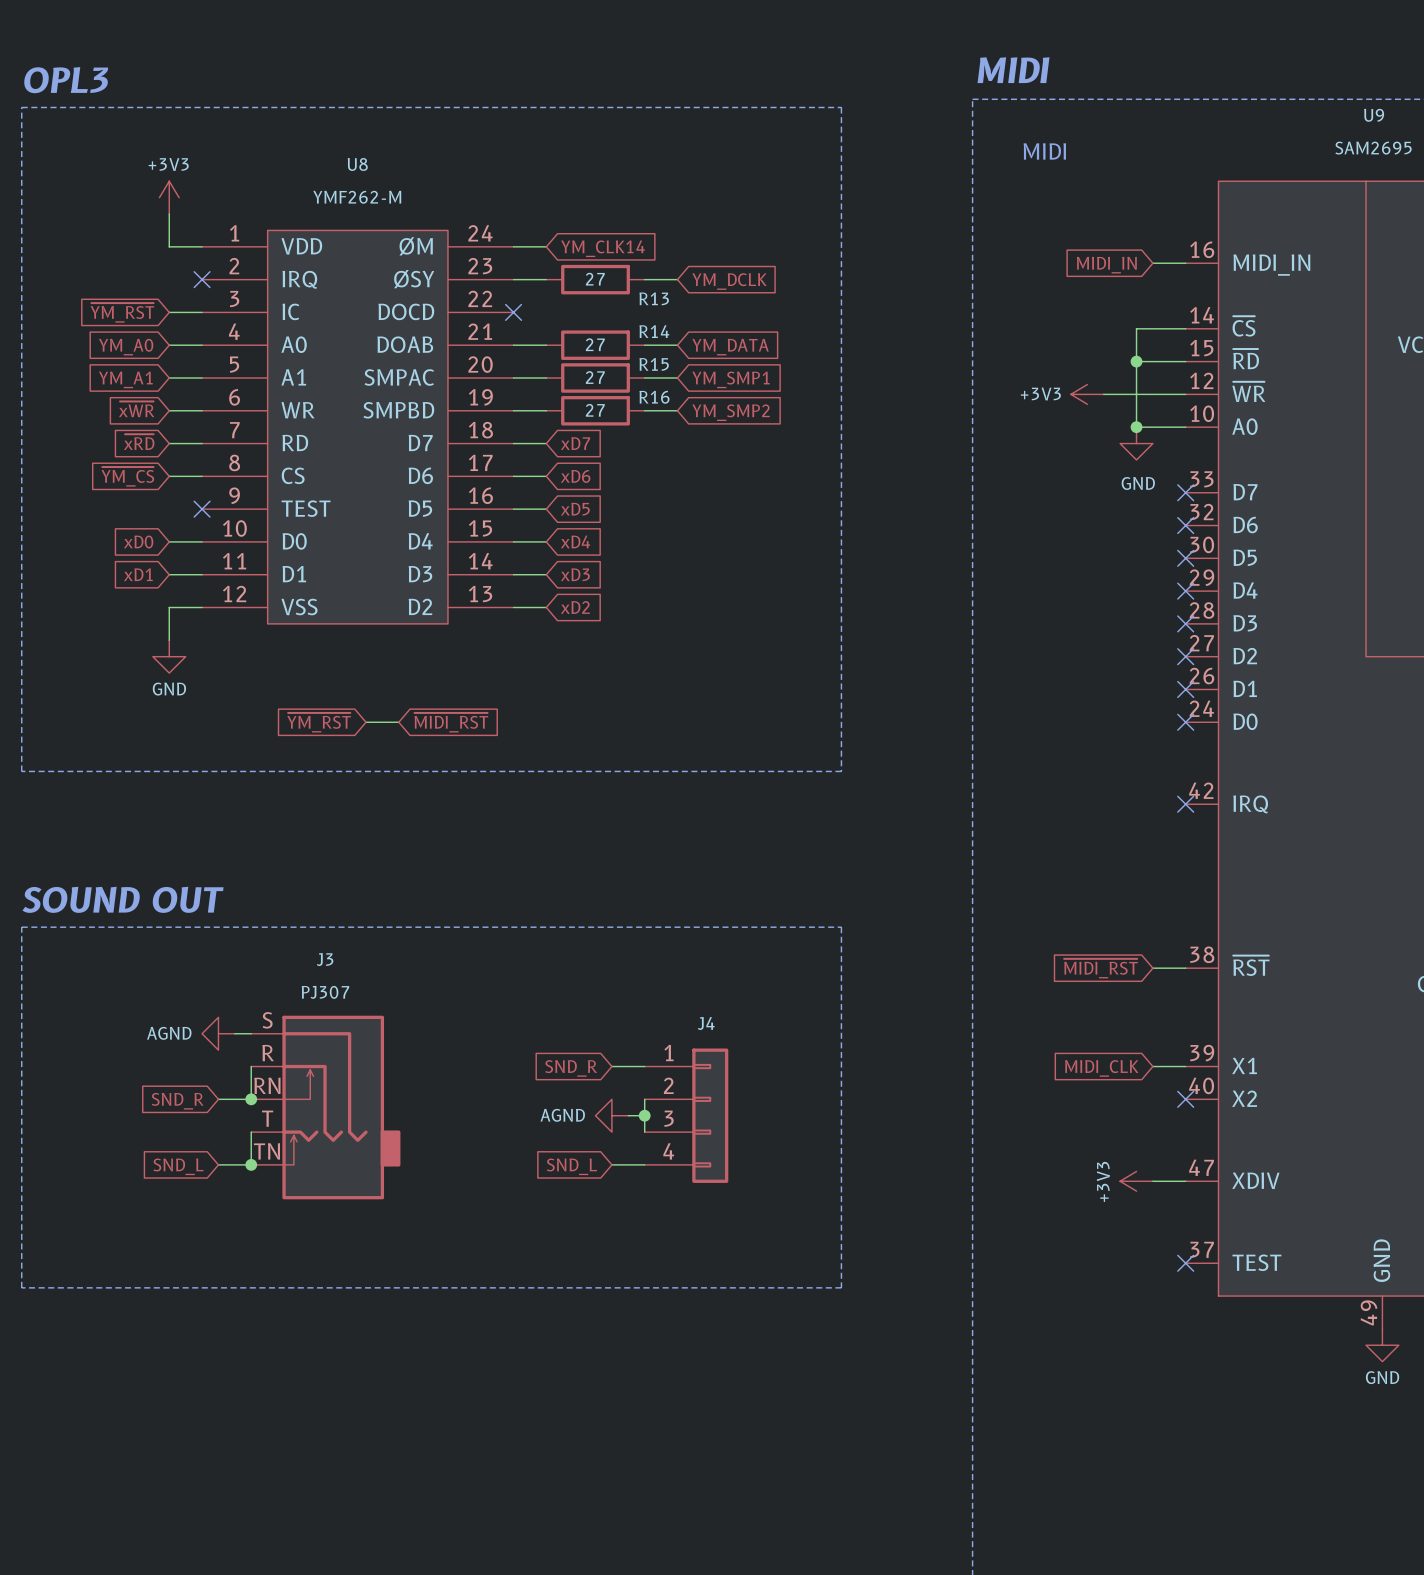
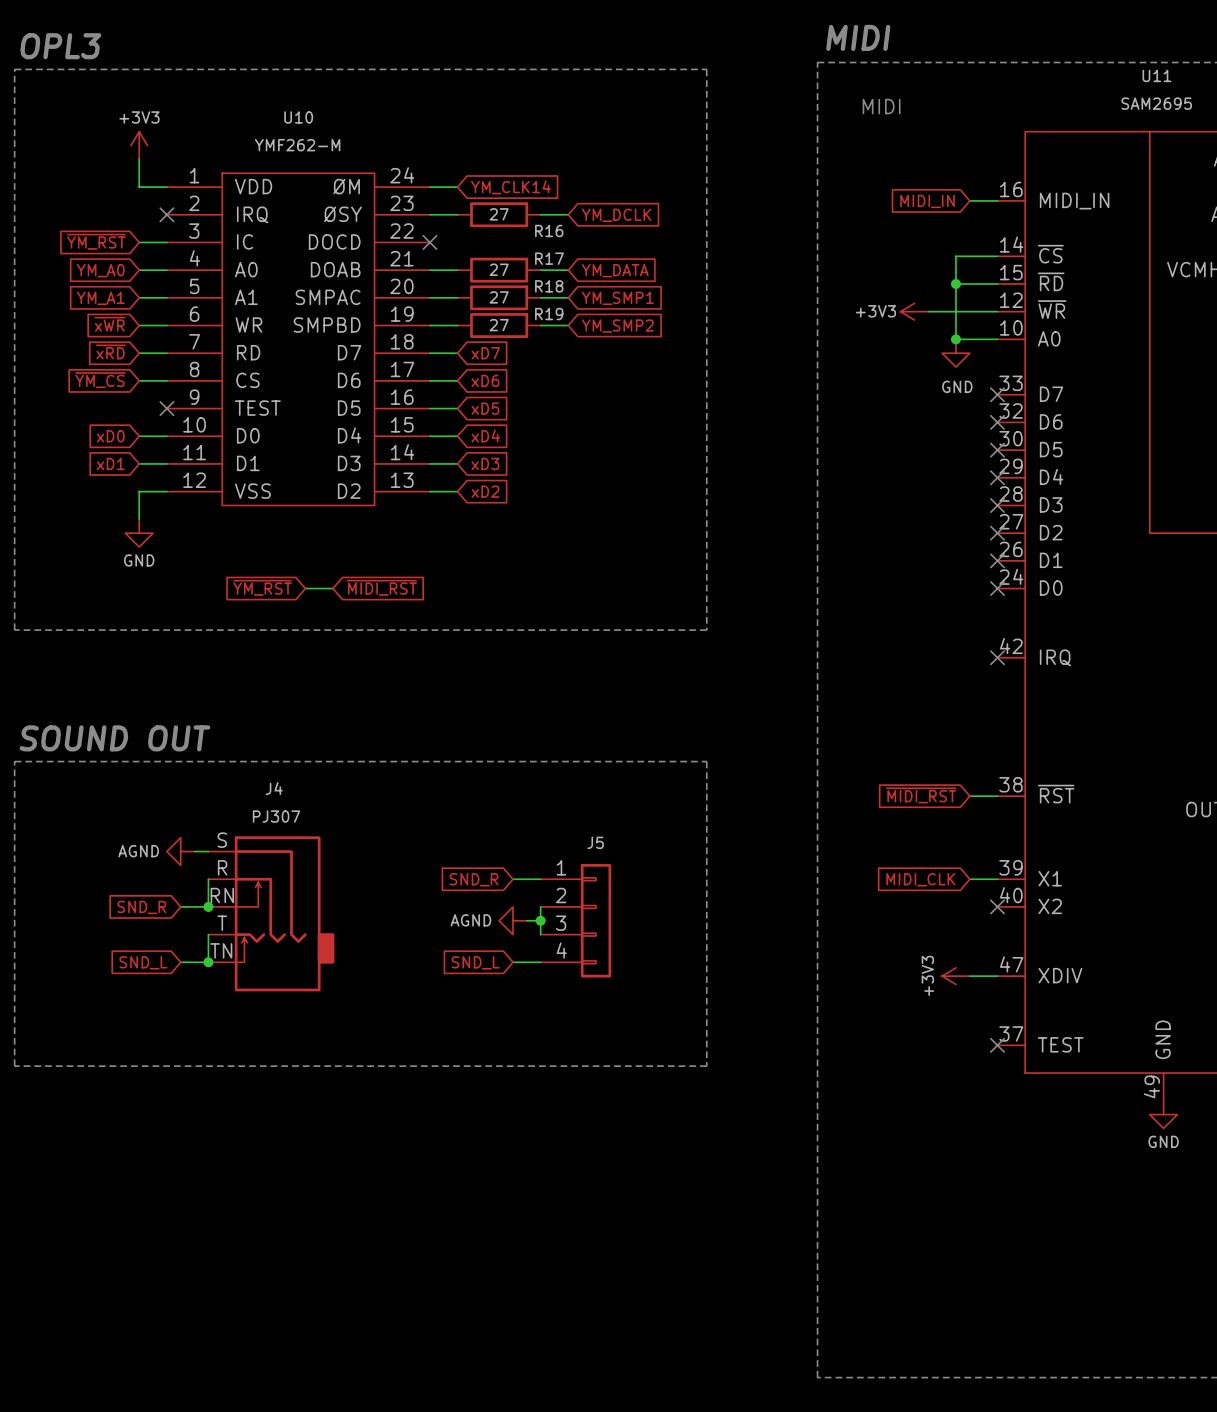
U9 name: U9 (1374, 115) -> U11 (1156, 75)
U8 name: U8 (357, 164) -> U10 (298, 117)
R13 name: R13 (654, 298) -> R16 (549, 230)
R14 name: R14 (654, 331) -> R17 (549, 258)
R15 name: R15 (654, 364) -> R18 (549, 286)
R16 name: R16 (654, 397) -> R19 (549, 314)
J3 name: J3 (325, 959) -> J4 (274, 788)
J4 name: J4 (706, 1023) -> J5 (595, 842)

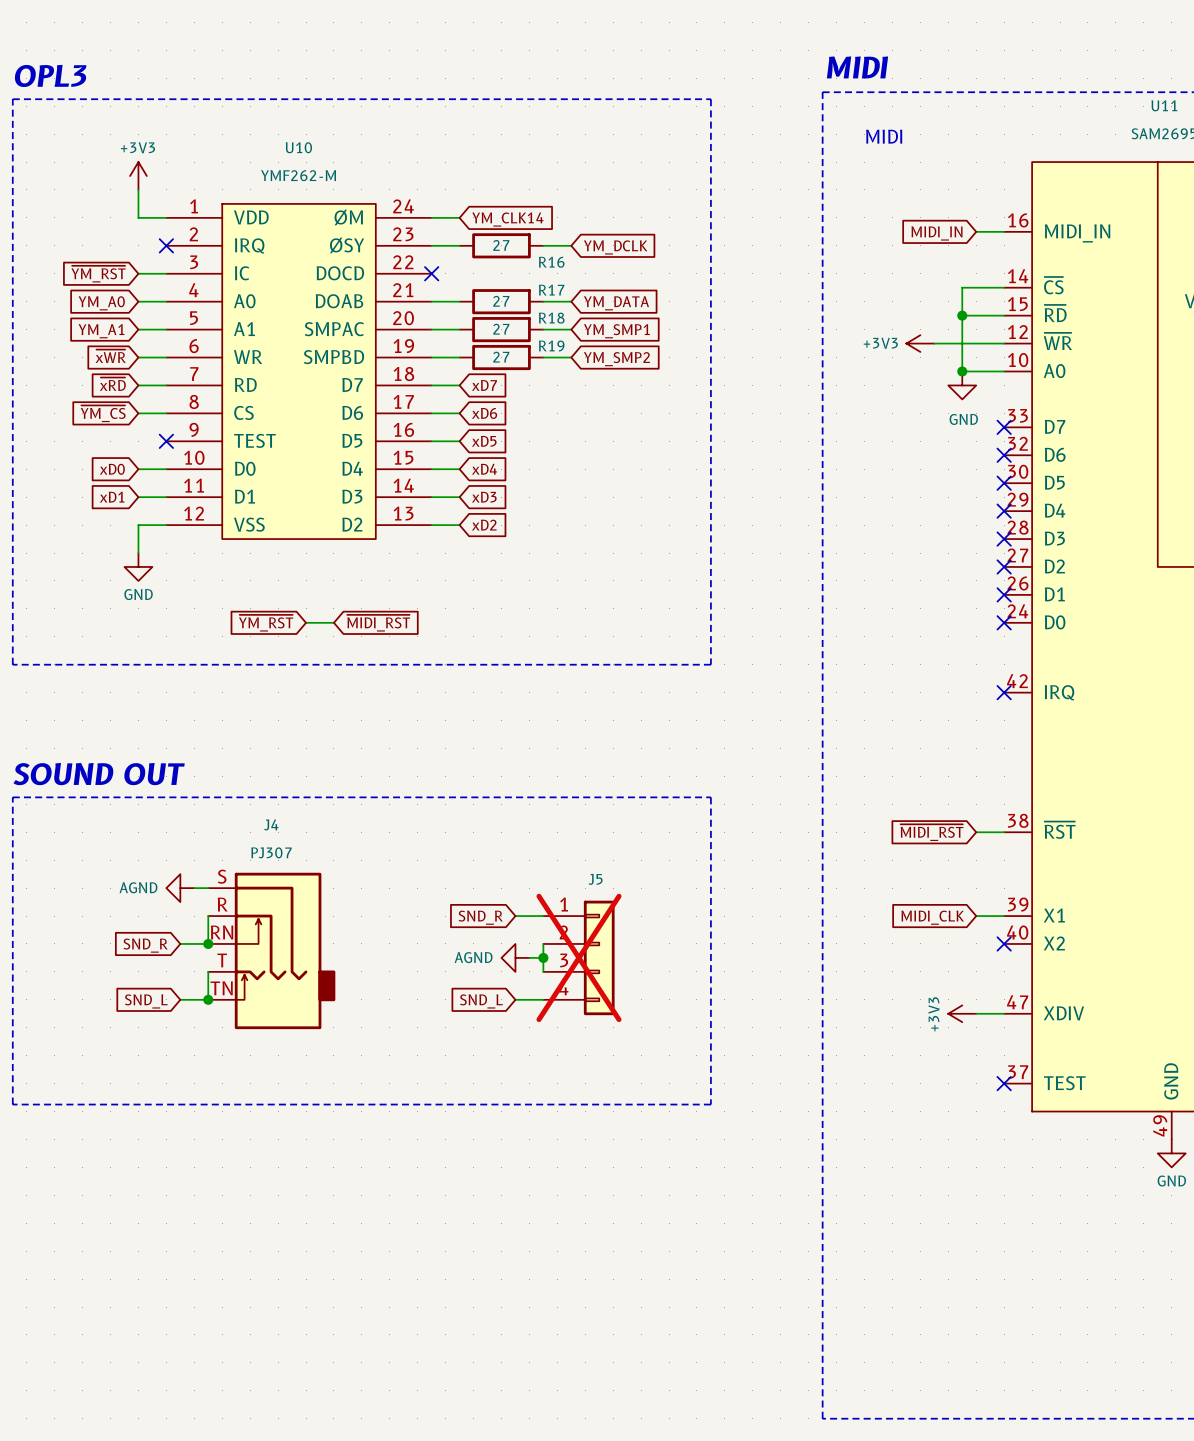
J5 do-not-place cross: none -> (578, 957)

